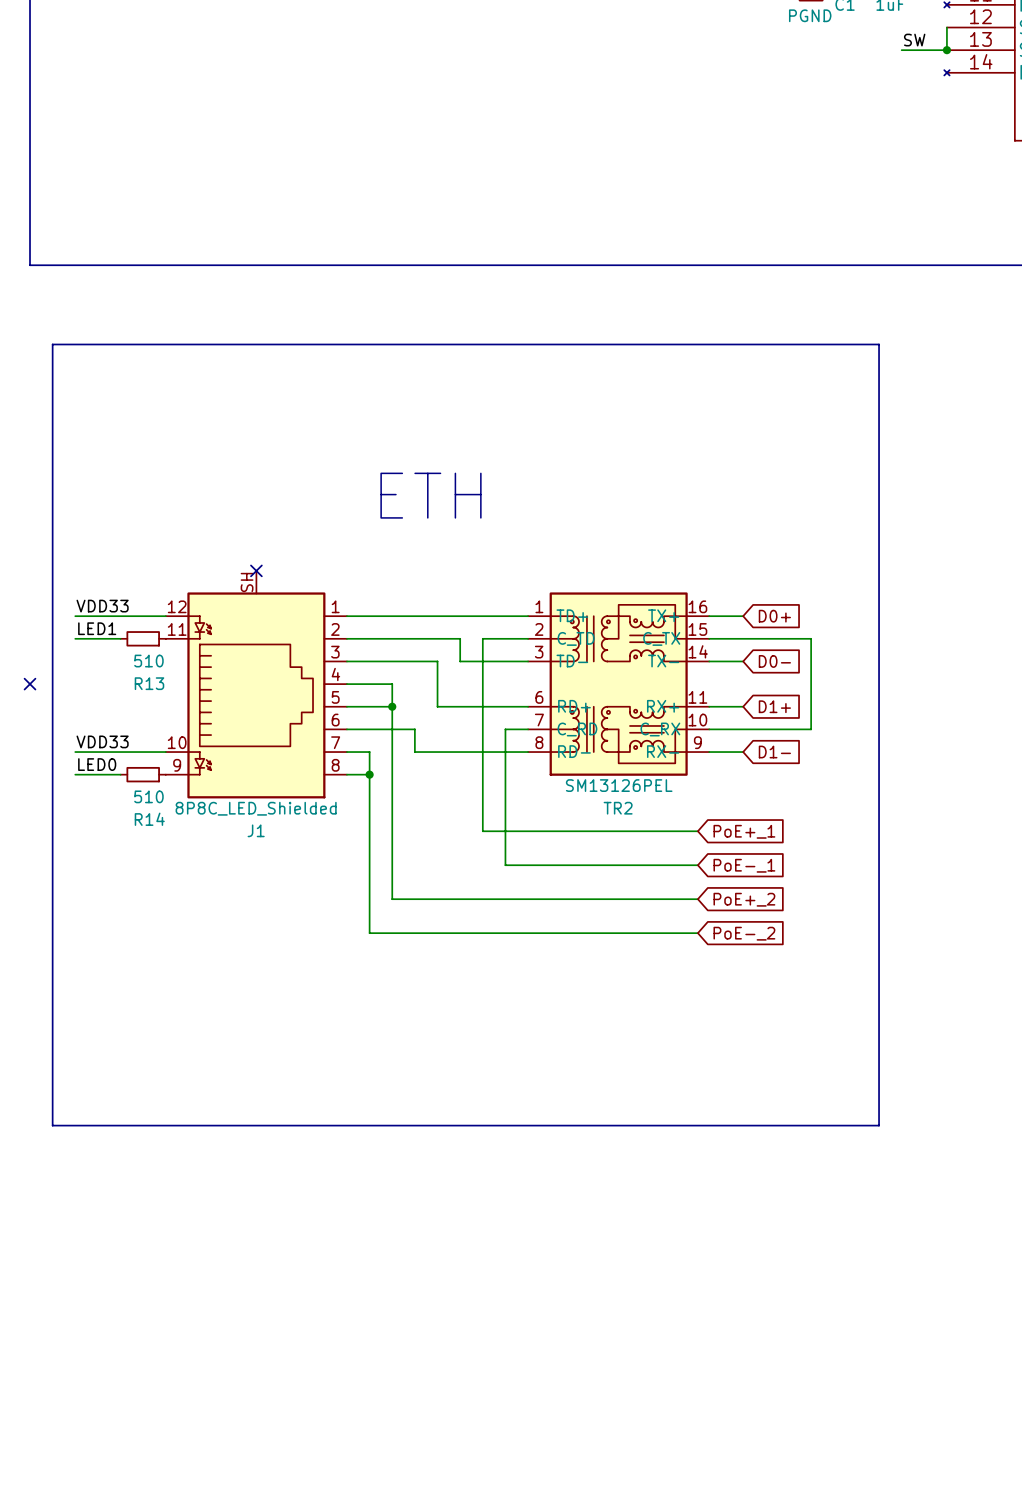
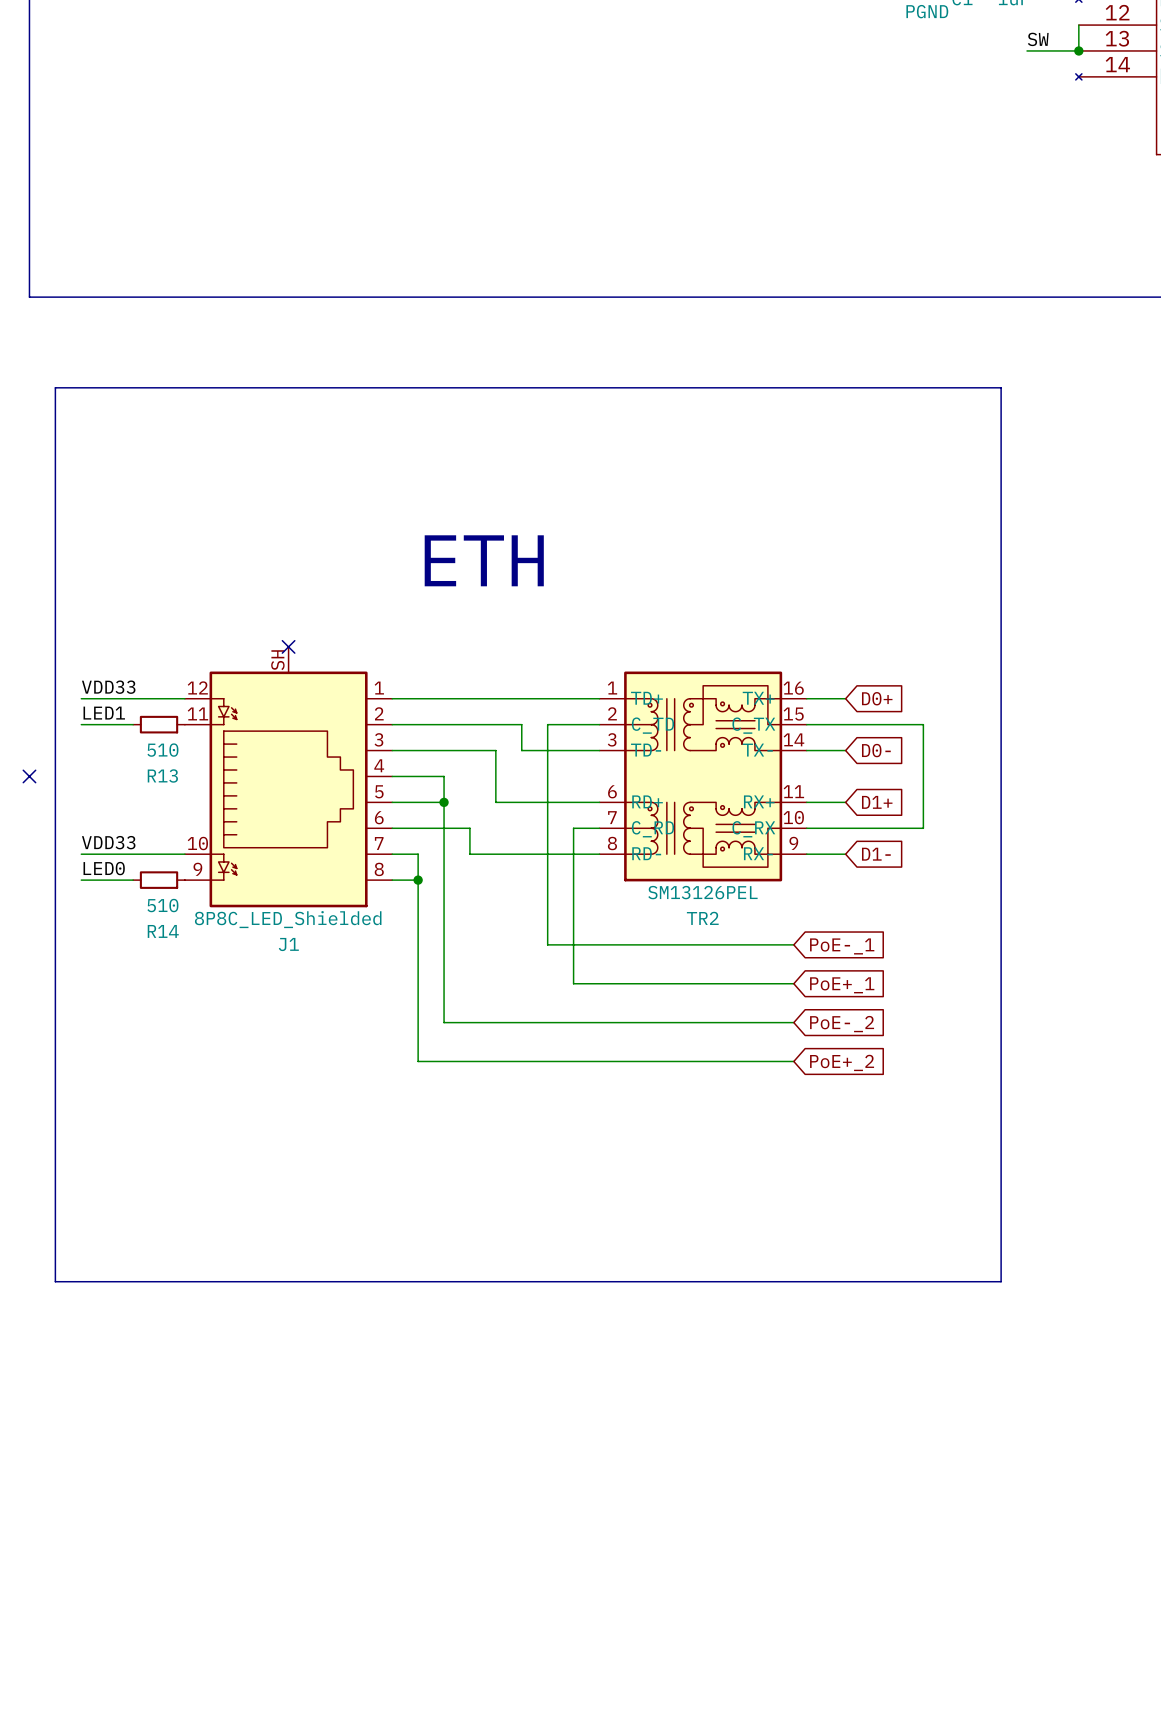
global label: PoE+_1 (744, 831) -> PoE-_1 (842, 946)
global label: PoE-_1 (744, 865) -> PoE+_1 (842, 985)
global label: PoE+_2 (744, 899) -> PoE-_2 (842, 1024)
global label: PoE-_2 (744, 933) -> PoE+_2 (842, 1062)

